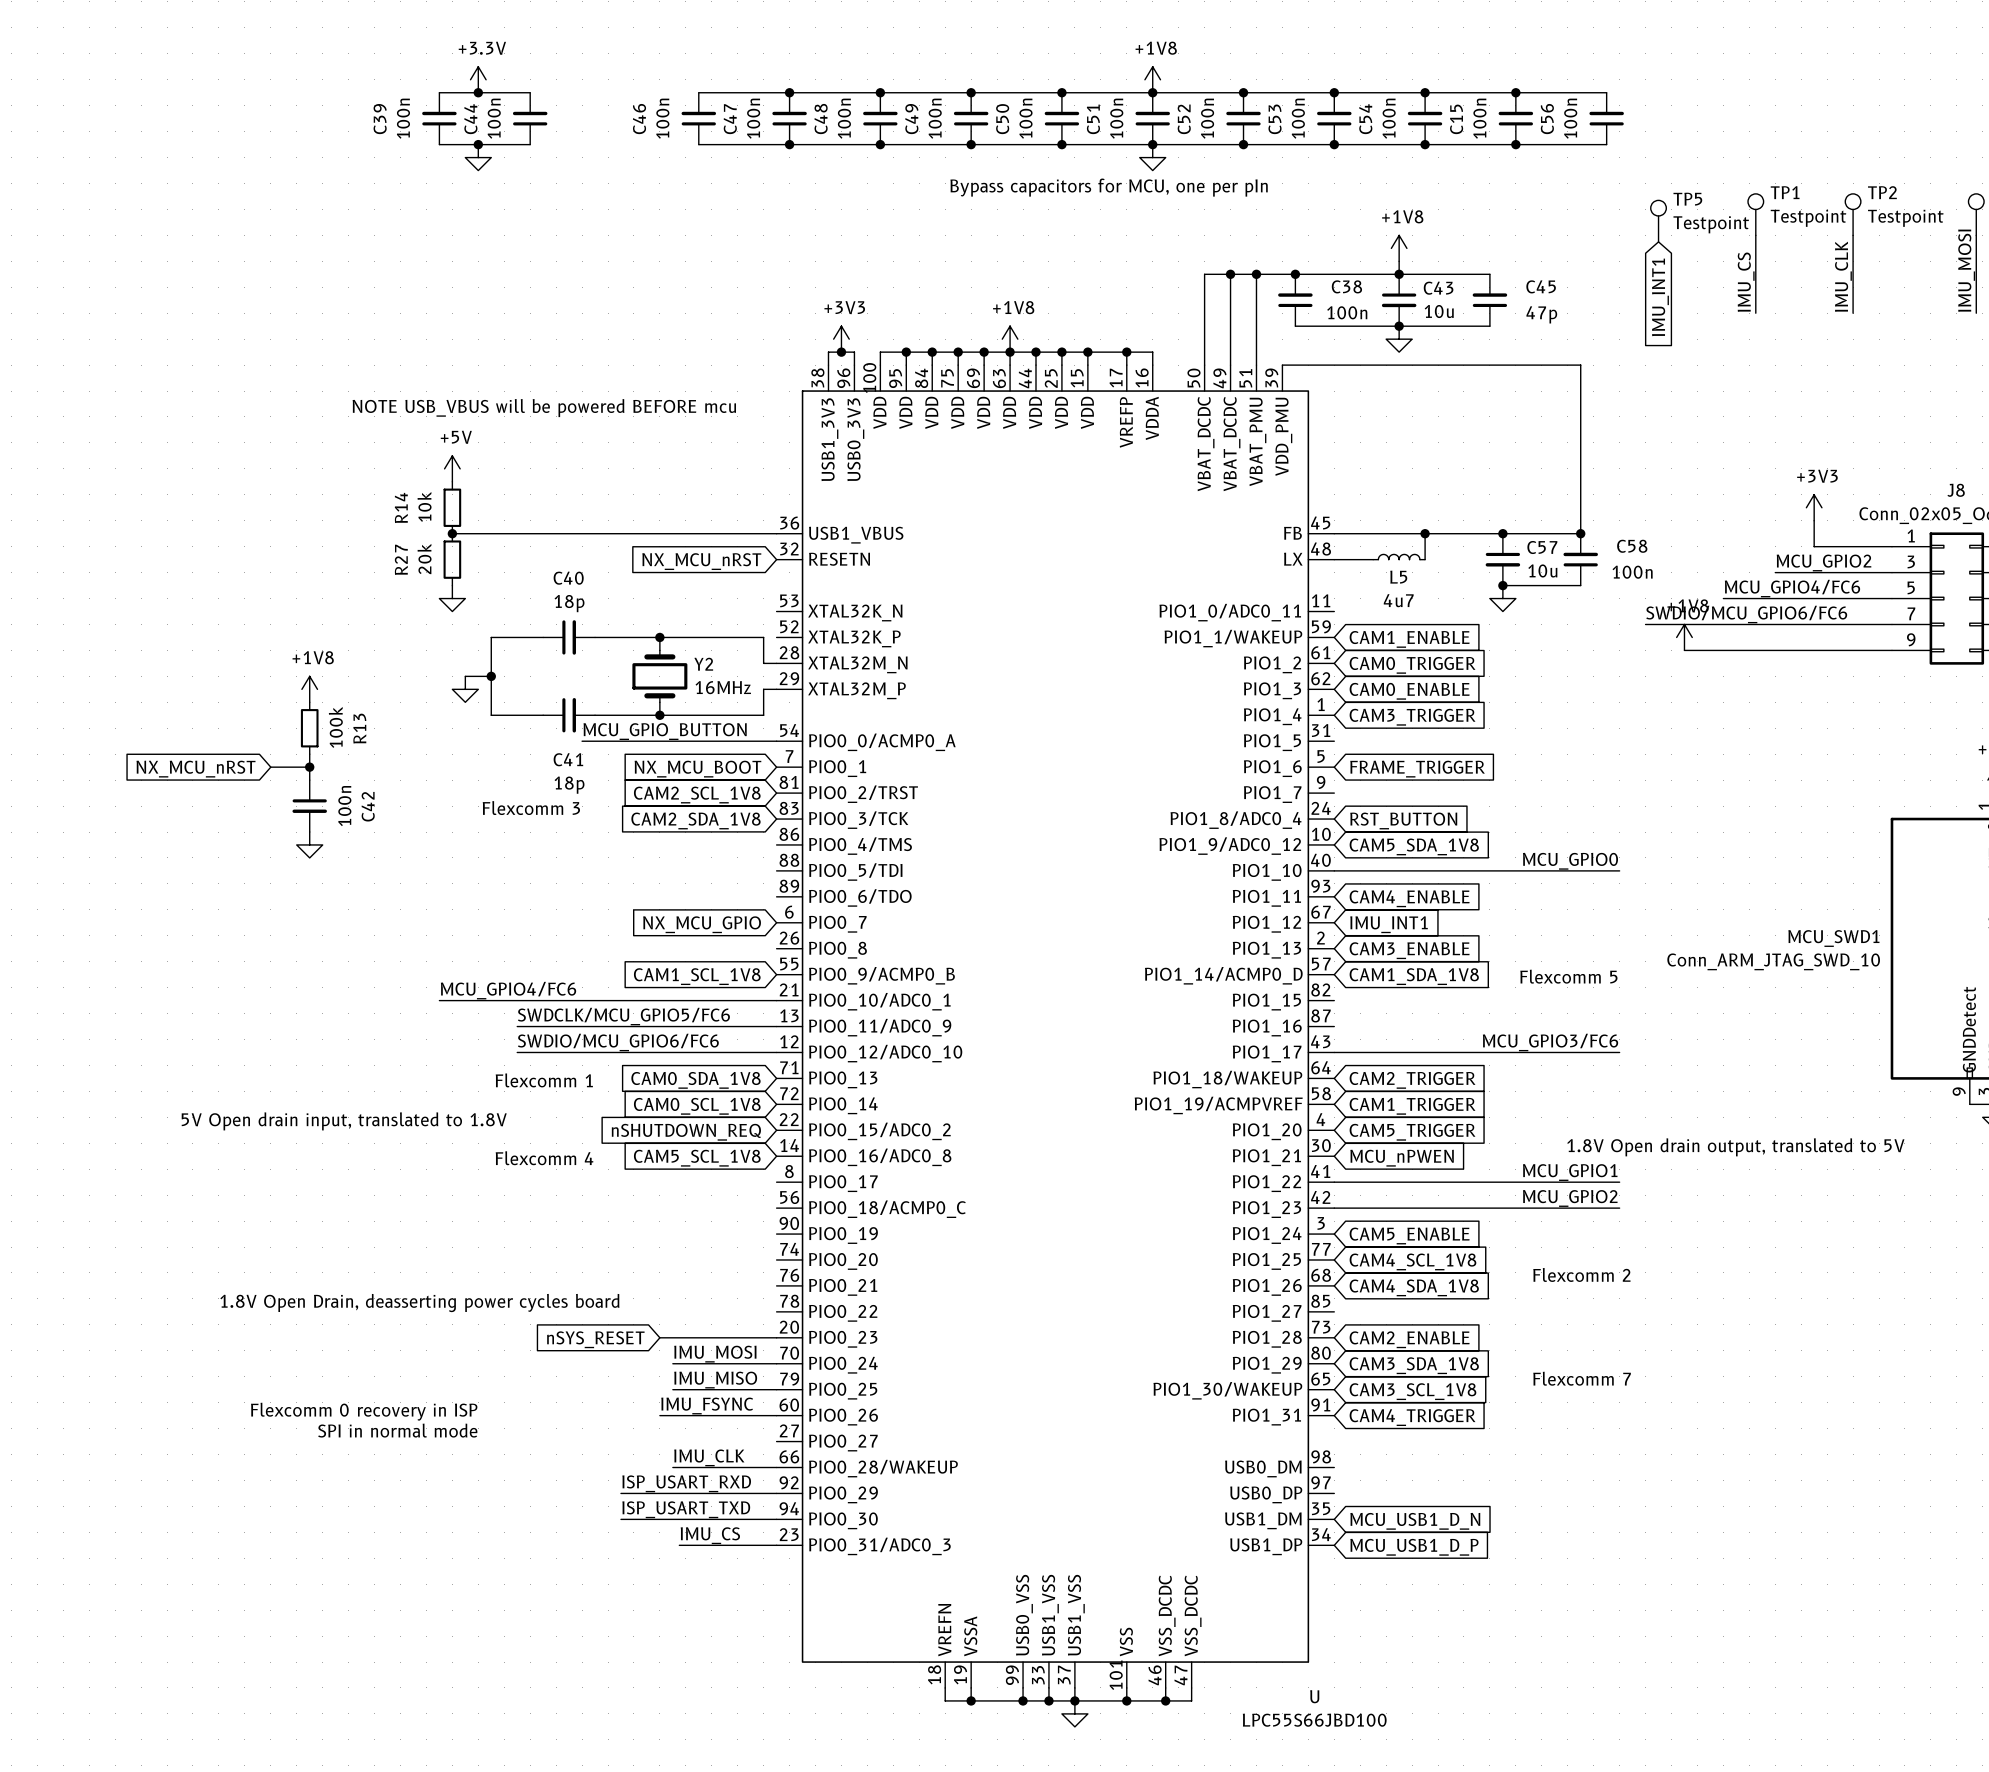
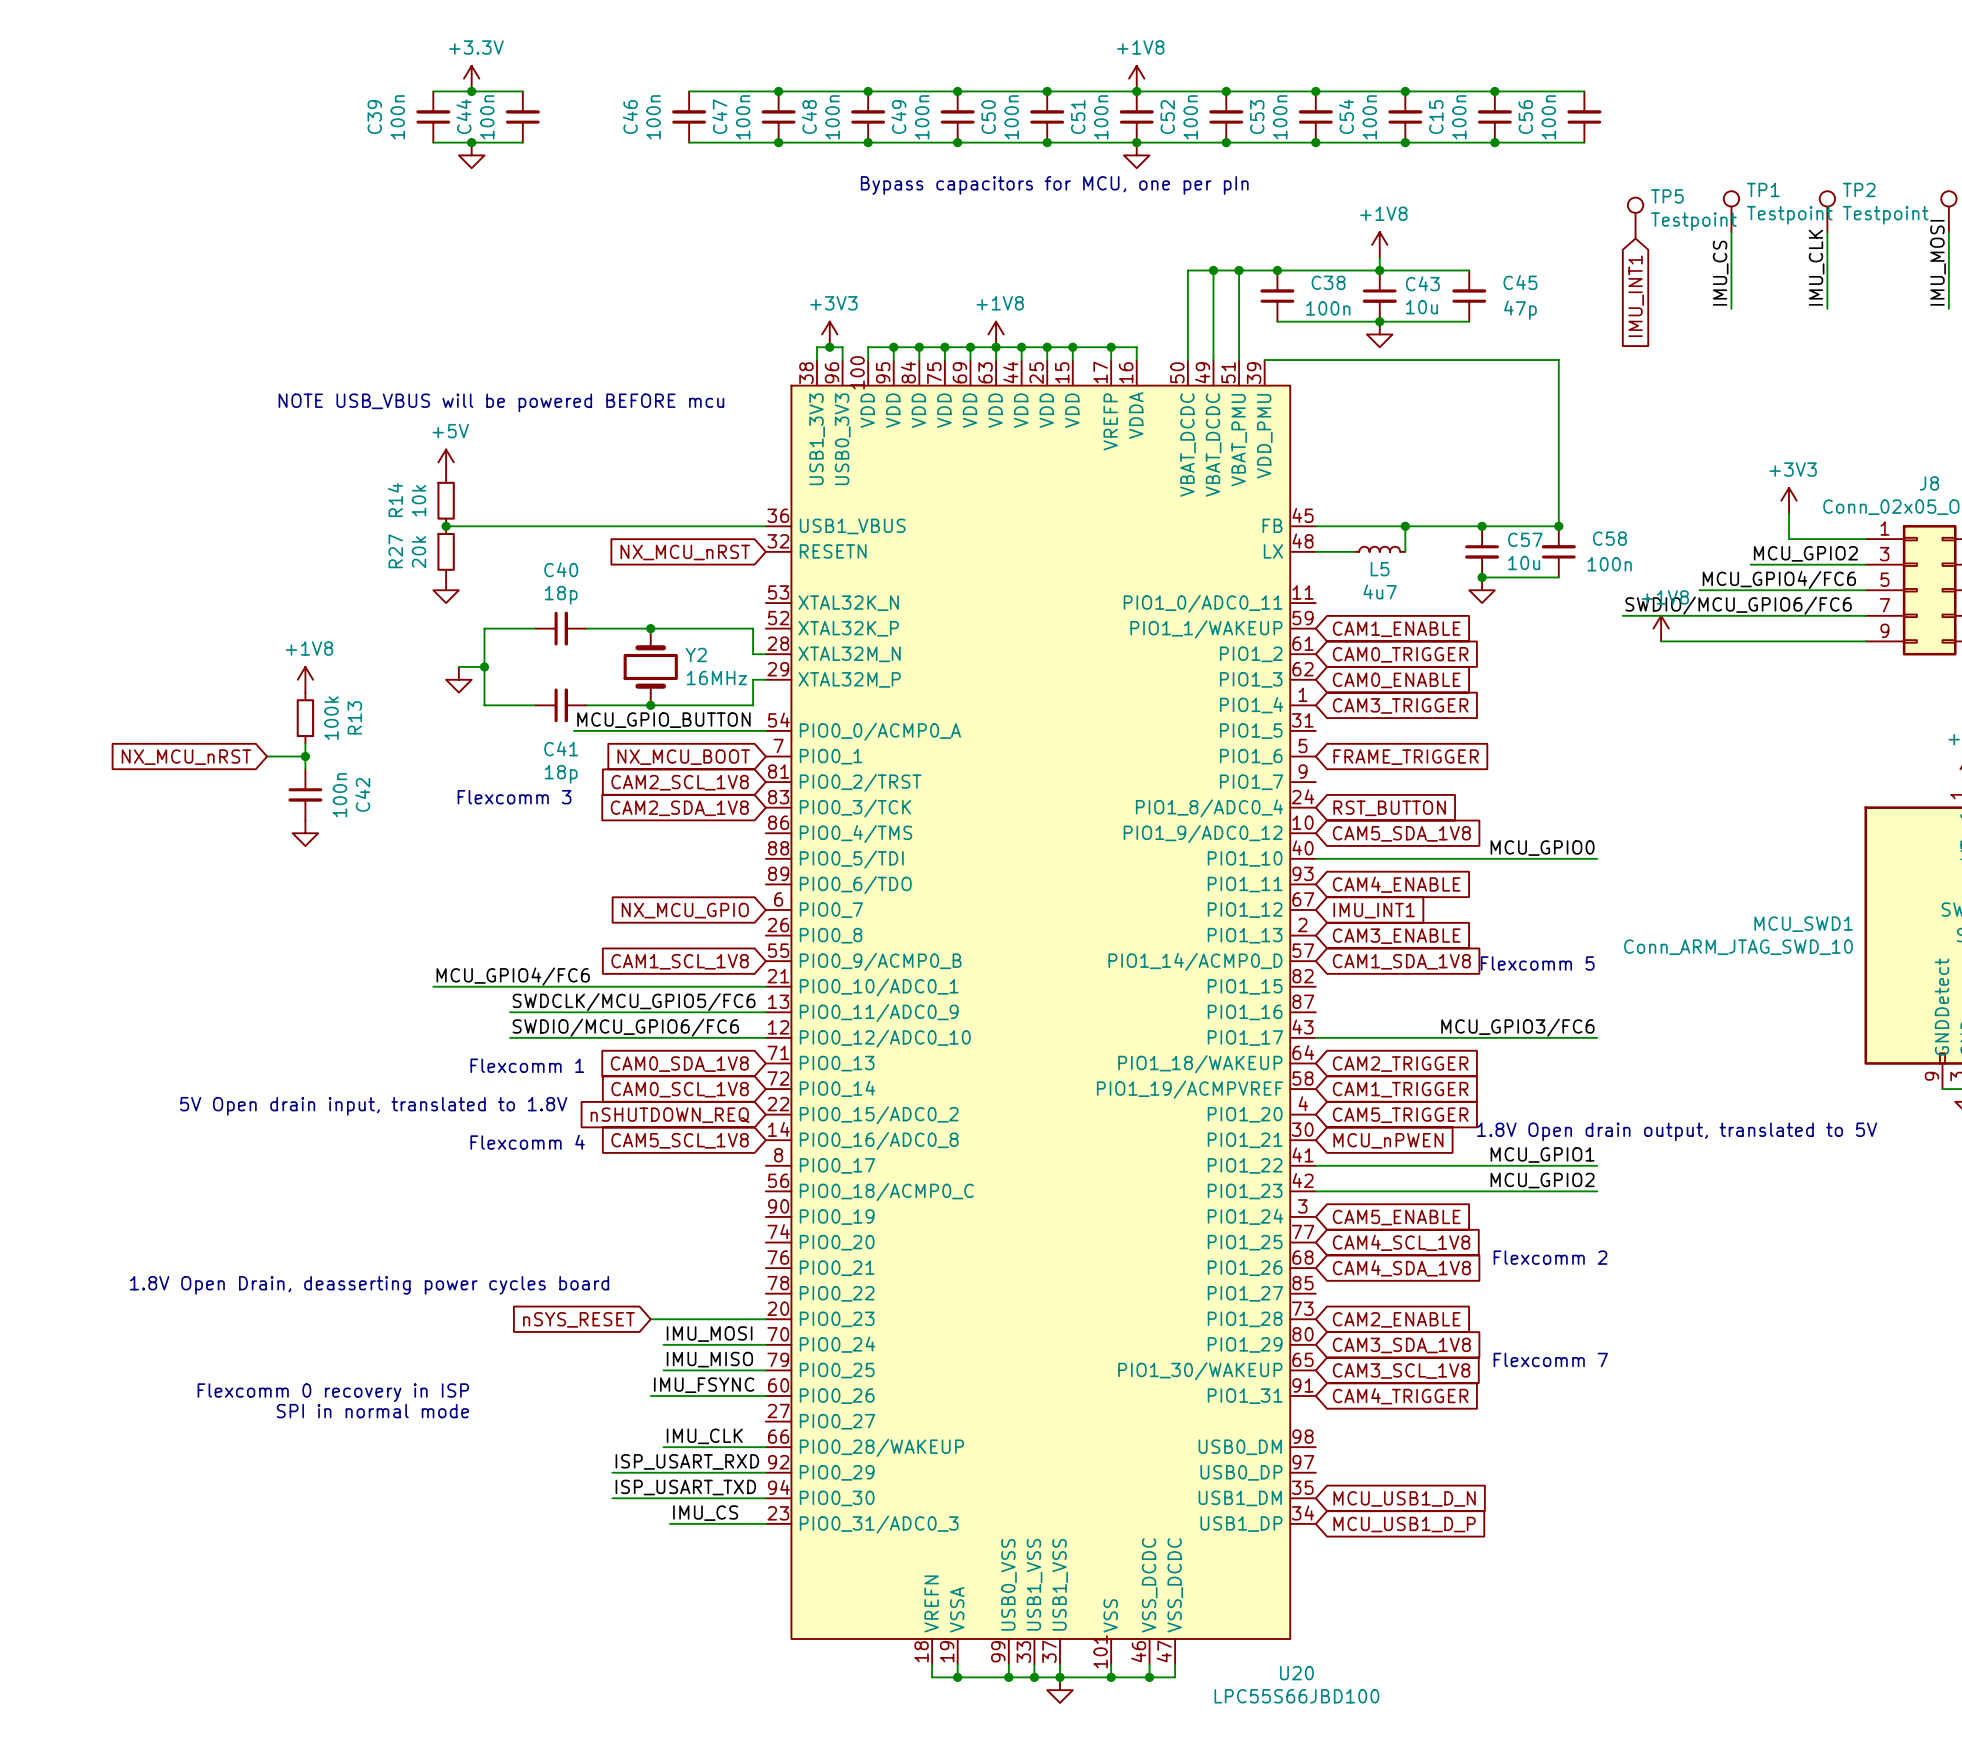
U name: U (1314, 1696) -> U20 (1296, 1673)

